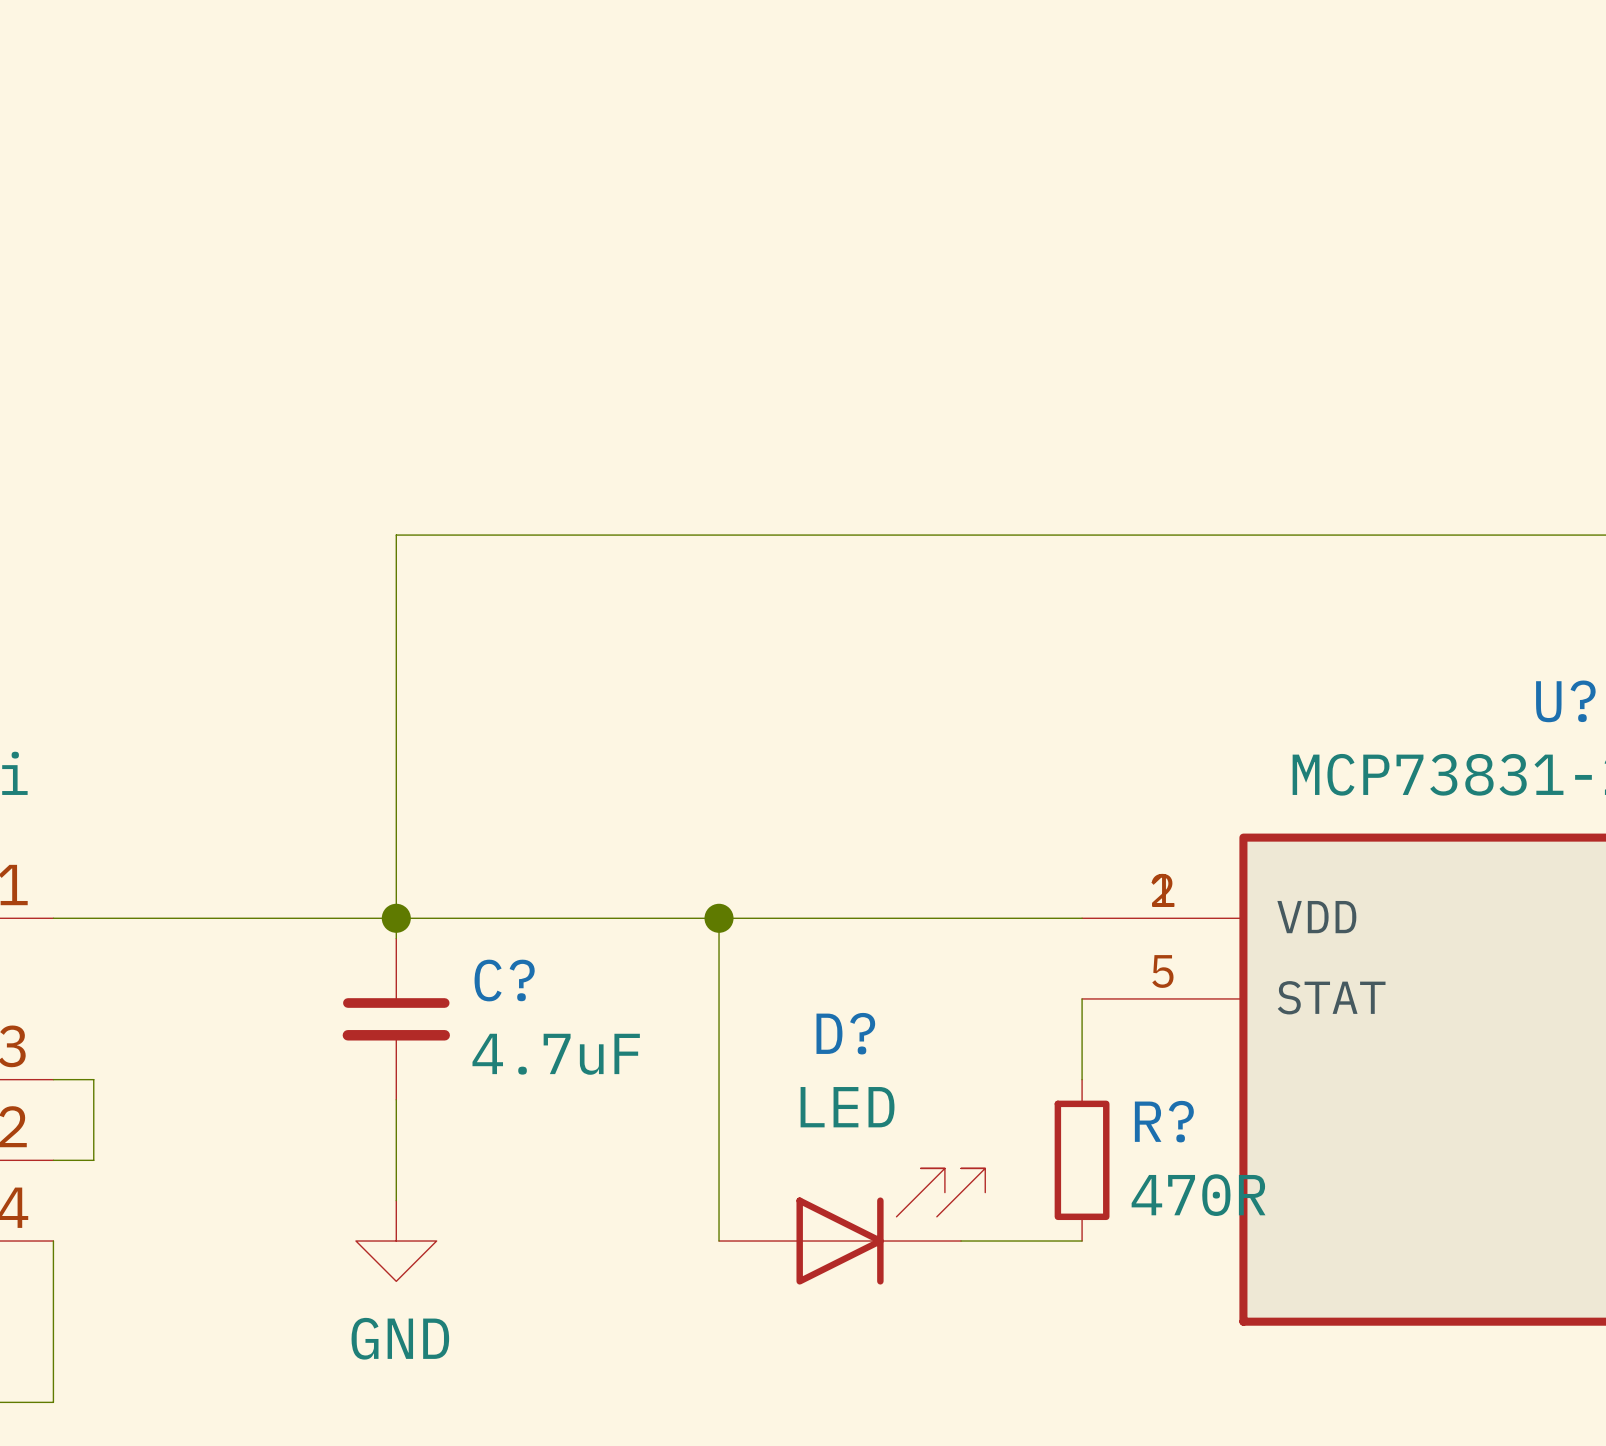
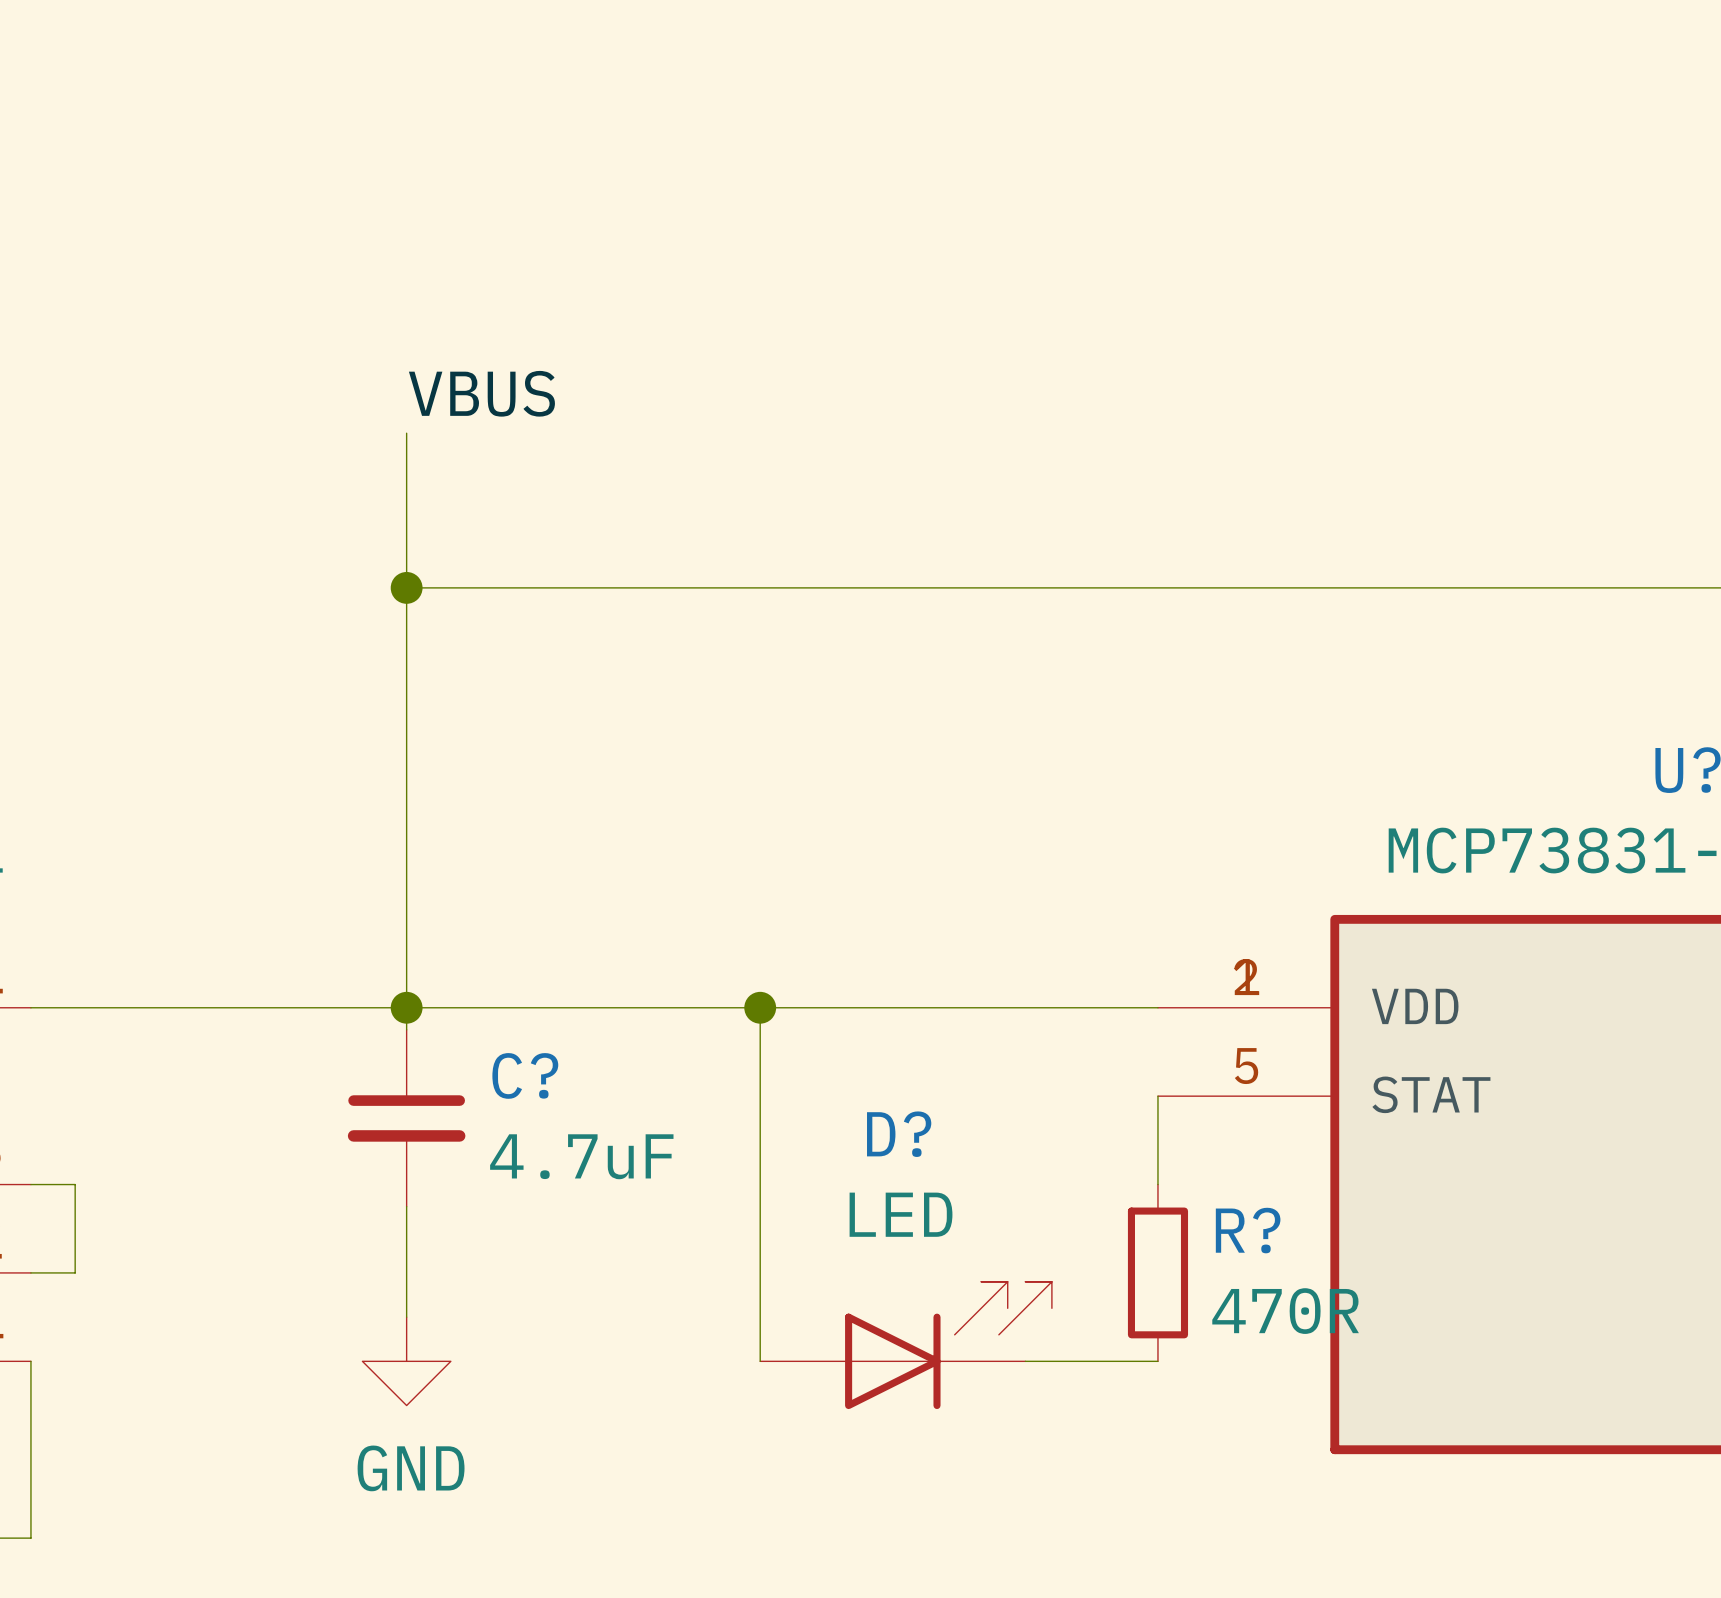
label: none -> VBUS (481, 393)
wire: none -> (406, 433) (406, 587)
junction: none -> (406, 587)

